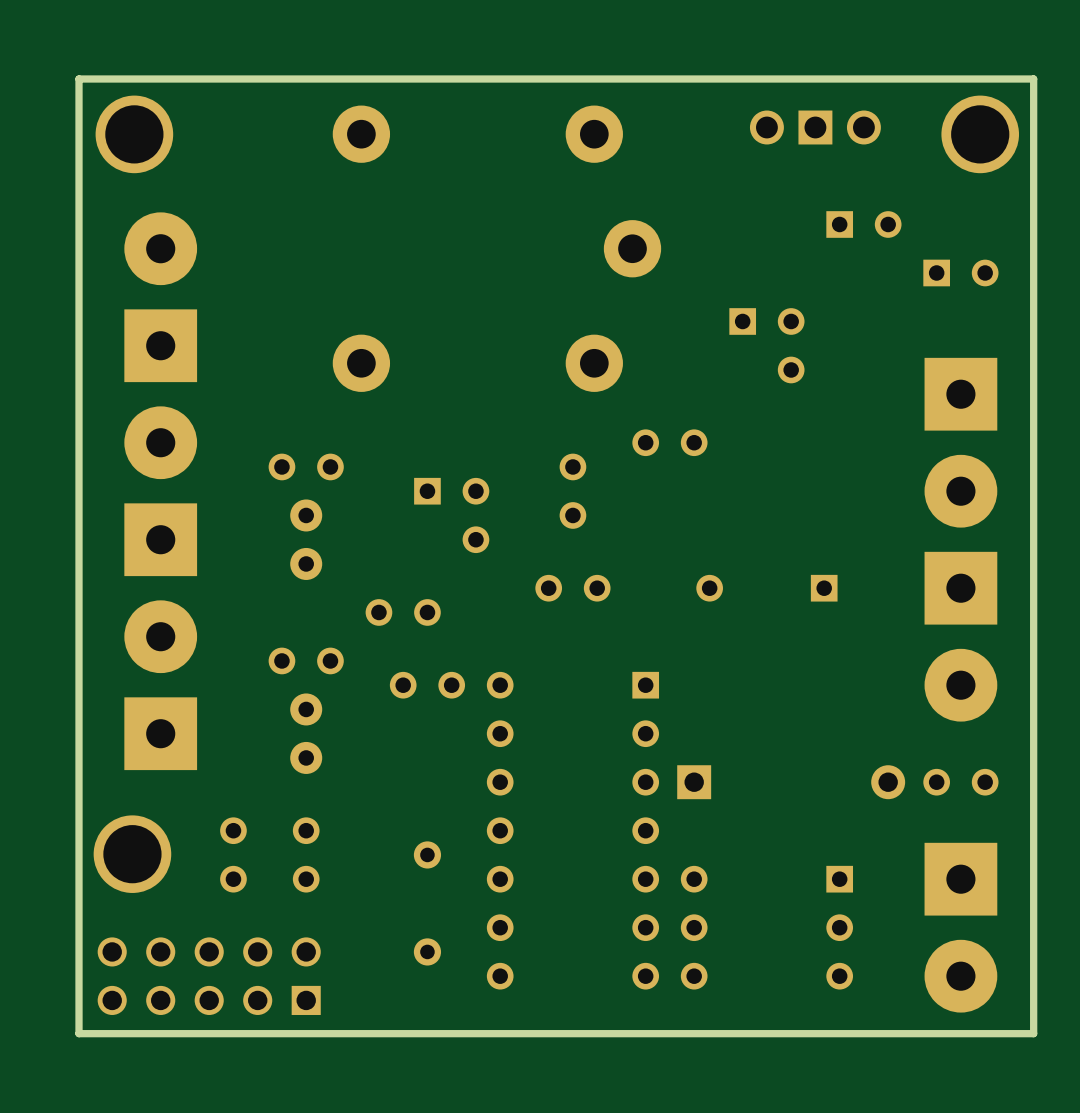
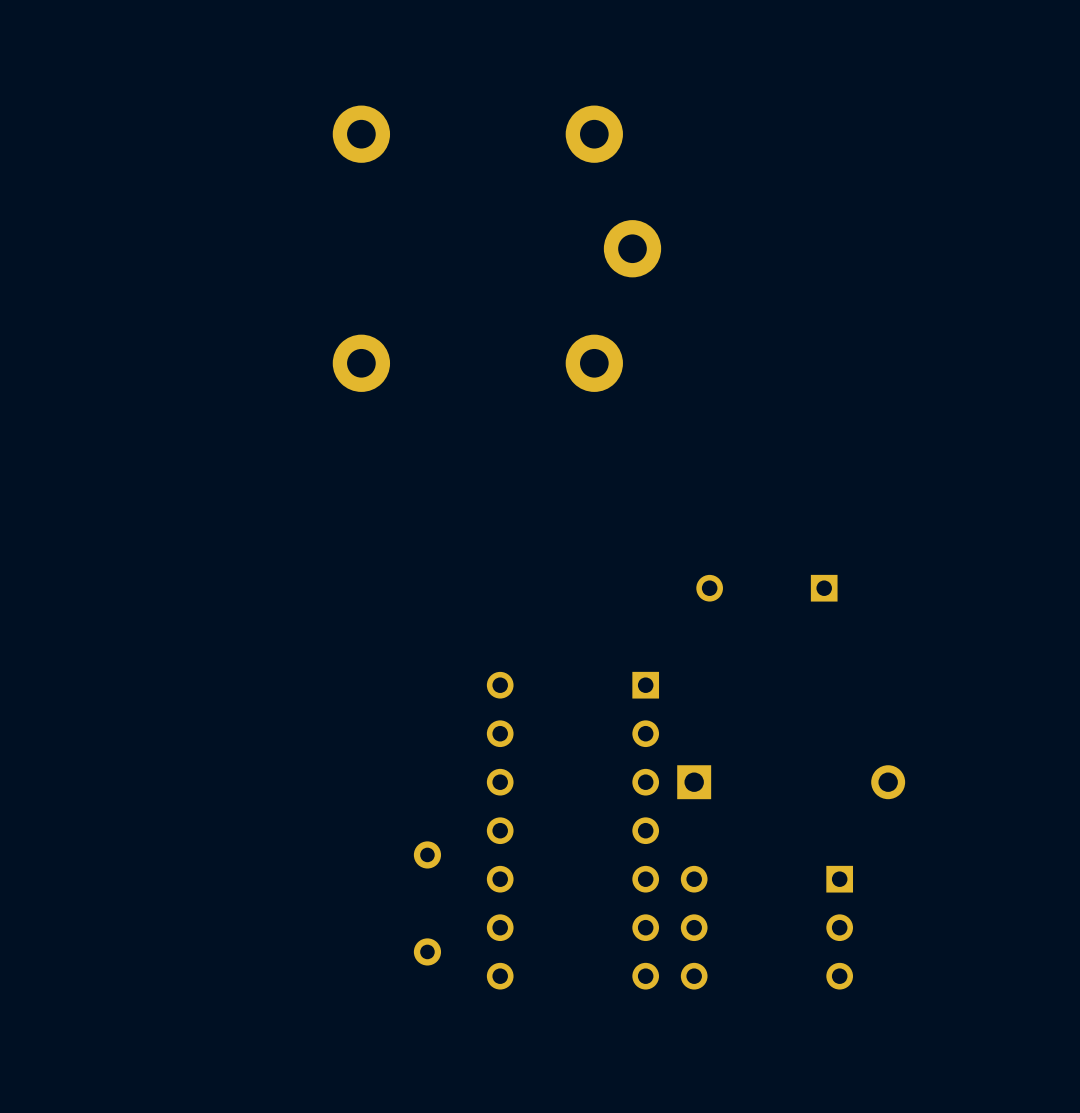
board edge: (1033, 79) (1033, 1033) (79, 1033) (79, 79) (1033, 79) -> none
part: (815, 127) -> none
part: (134, 134) -> none
part: (980, 134) -> none
part: (863, 224) -> none
part: (960, 272) -> none
part: (160, 297) -> none
part: (766, 345) -> none
part: (669, 442) -> none
part: (960, 442) -> none
part: (306, 466) -> none
part: (160, 491) -> none
part: (572, 491) -> none
part: (451, 515) -> none
part: (306, 539) -> none
part: (572, 588) -> none
part: (403, 612) -> none
part: (960, 636) -> none
part: (306, 660) -> none
part: (160, 685) -> none
part: (427, 685) -> none
part: (306, 733) -> none
part: (960, 782) -> none
part: (132, 854) -> none
part: (233, 854) -> none
part: (306, 854) -> none
part: (960, 927) -> none
part: (209, 976) -> none

